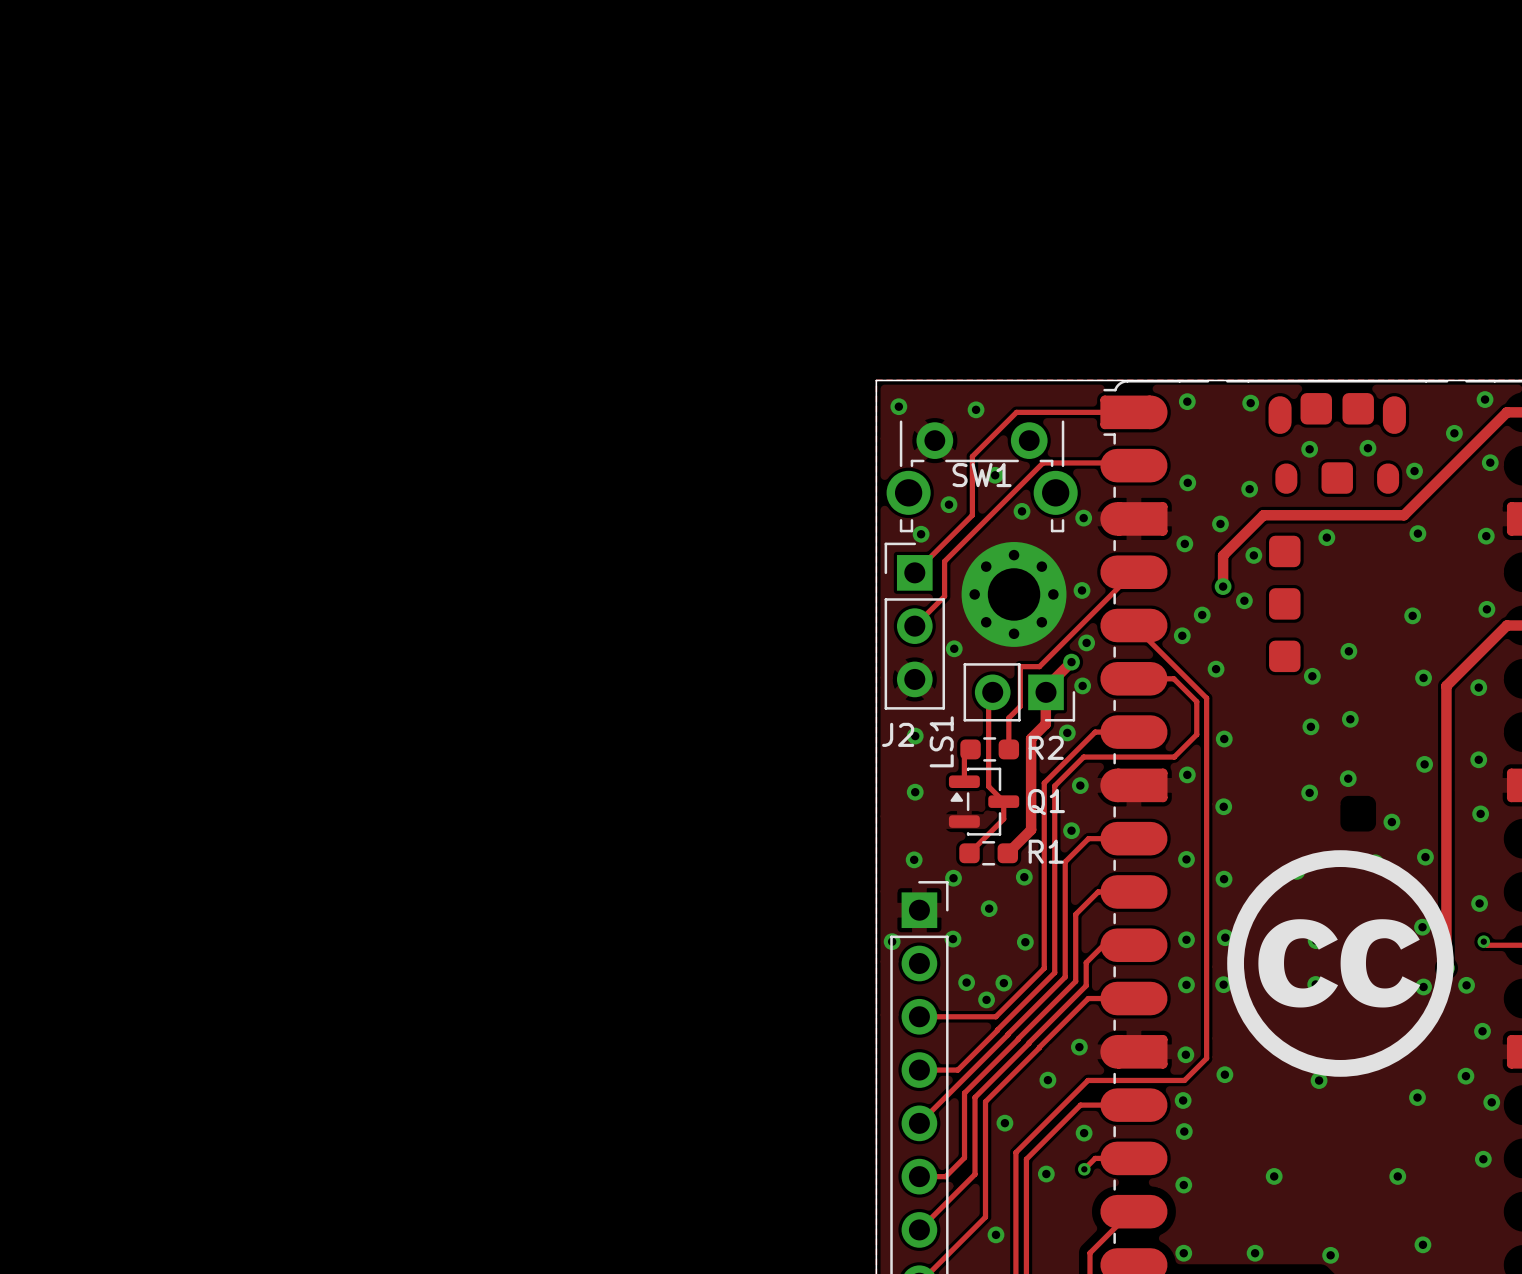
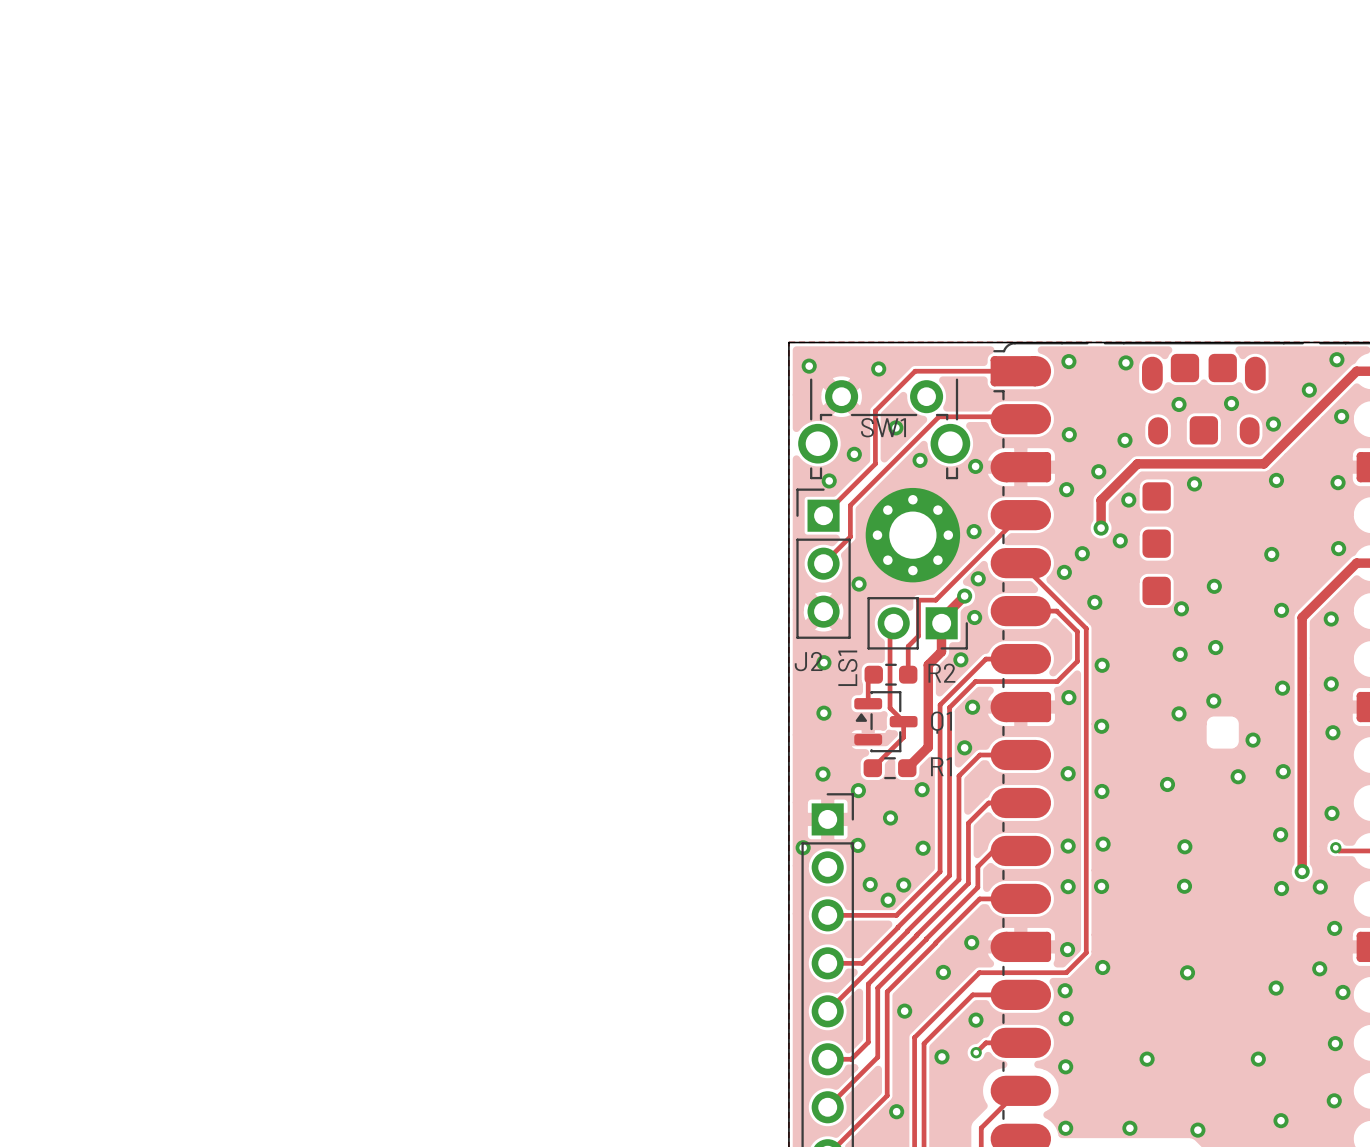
drawing: [1227, 850, 1454, 1077] -> none
via: none -> (1334, 1100)

